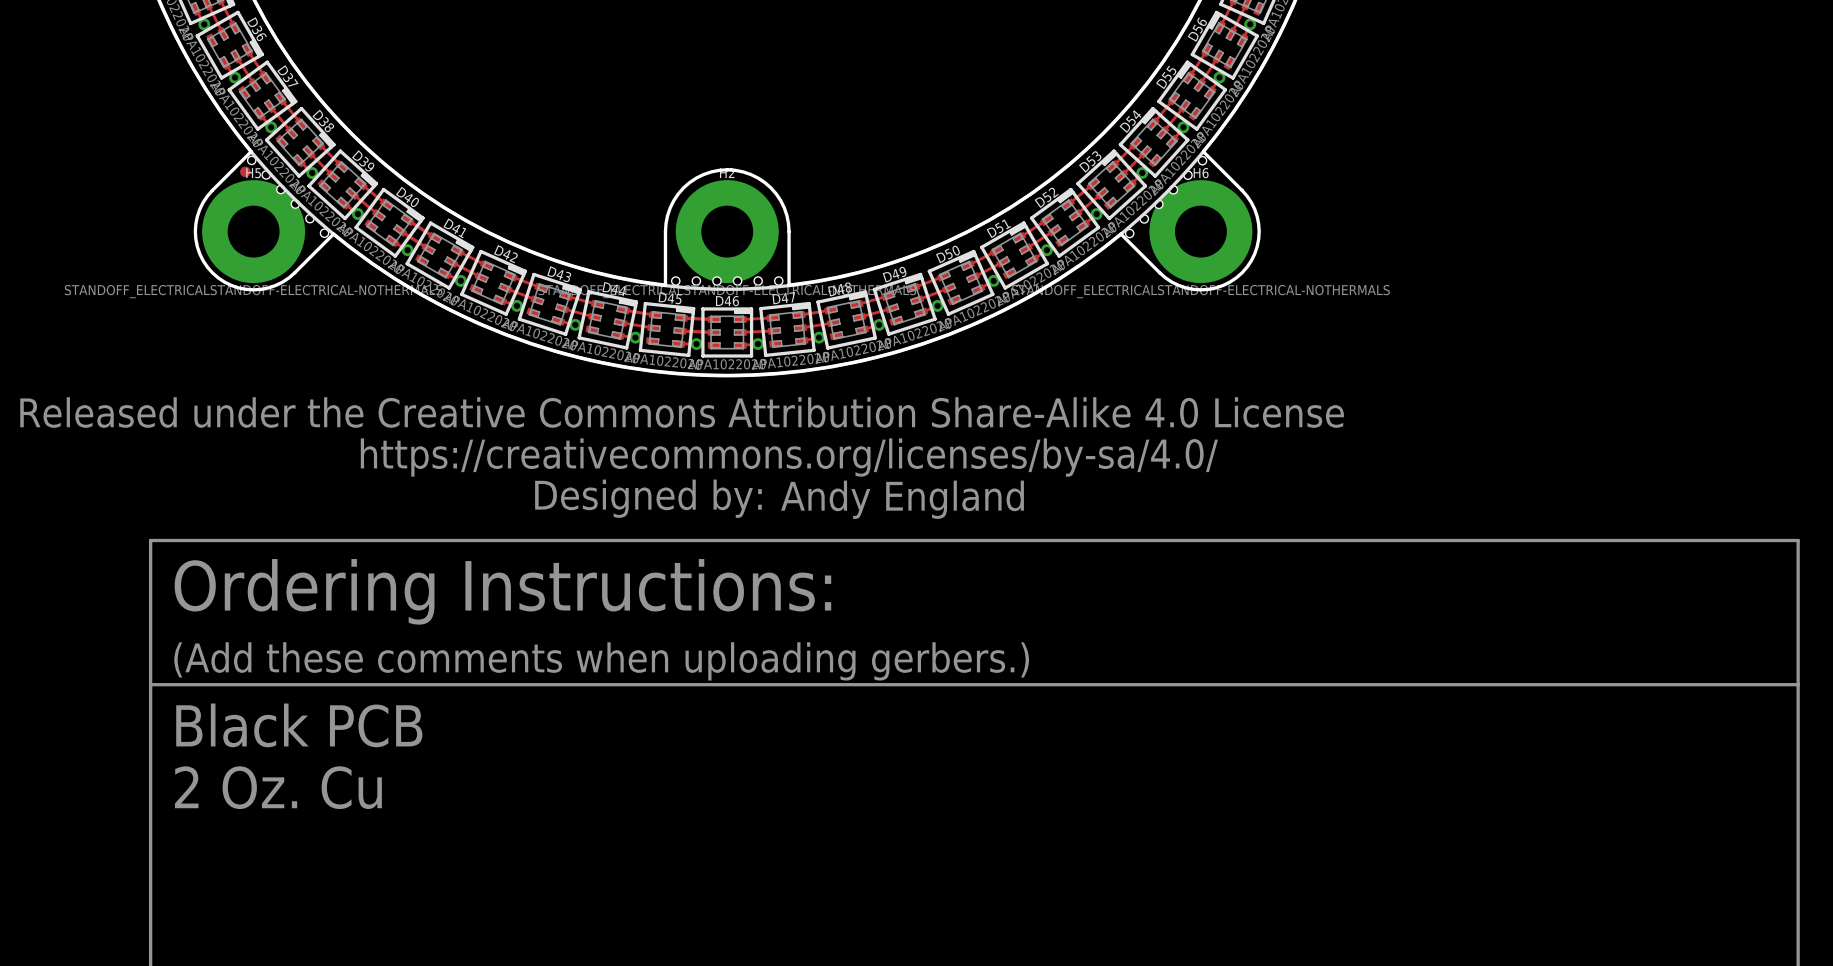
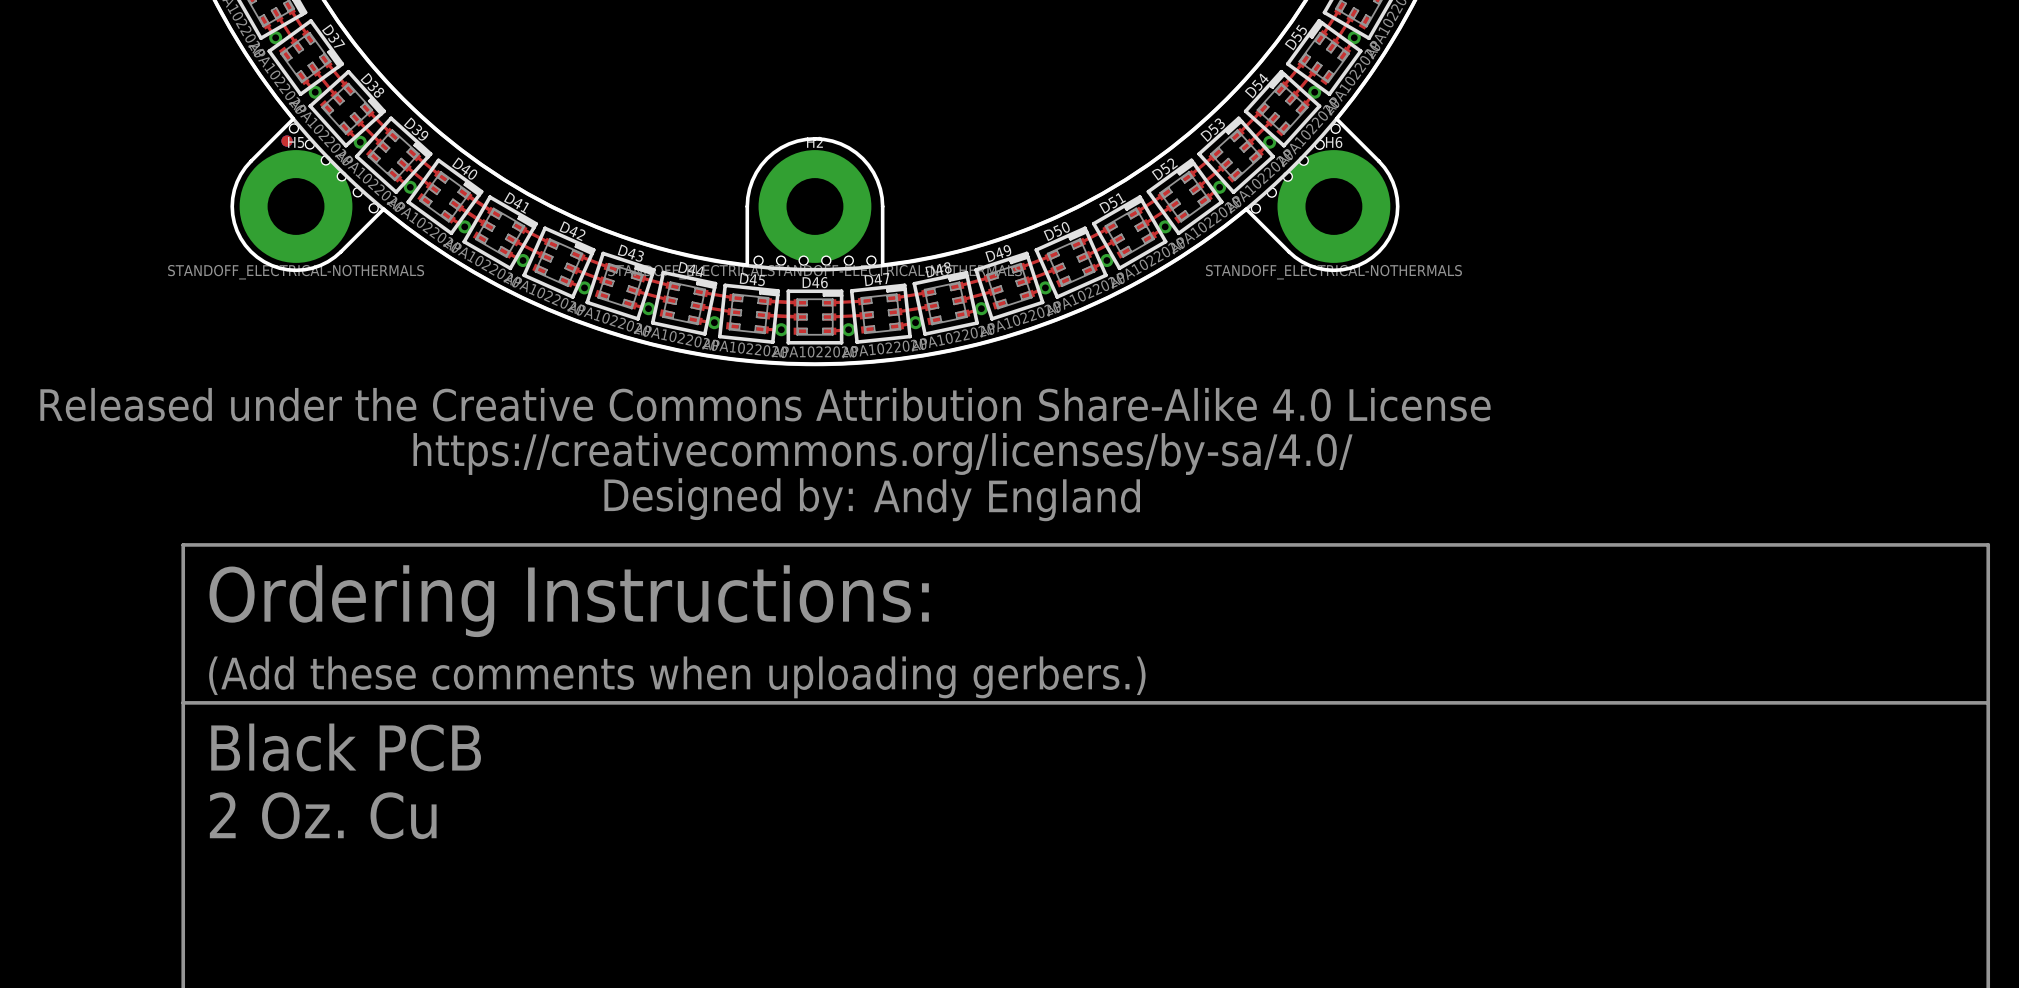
H5 value: STANDOFF_ELECTRICALSTANDOFF-ELECTRICAL-NOTHERMALS (253, 291) -> STANDOFF_ELECTRICAL-NOTHERMALS (296, 272)
H6 value: STANDOFF_ELECTRICALSTANDOFF-ELECTRICAL-NOTHERMALS (1200, 291) -> STANDOFF_ELECTRICAL-NOTHERMALS (1333, 272)

